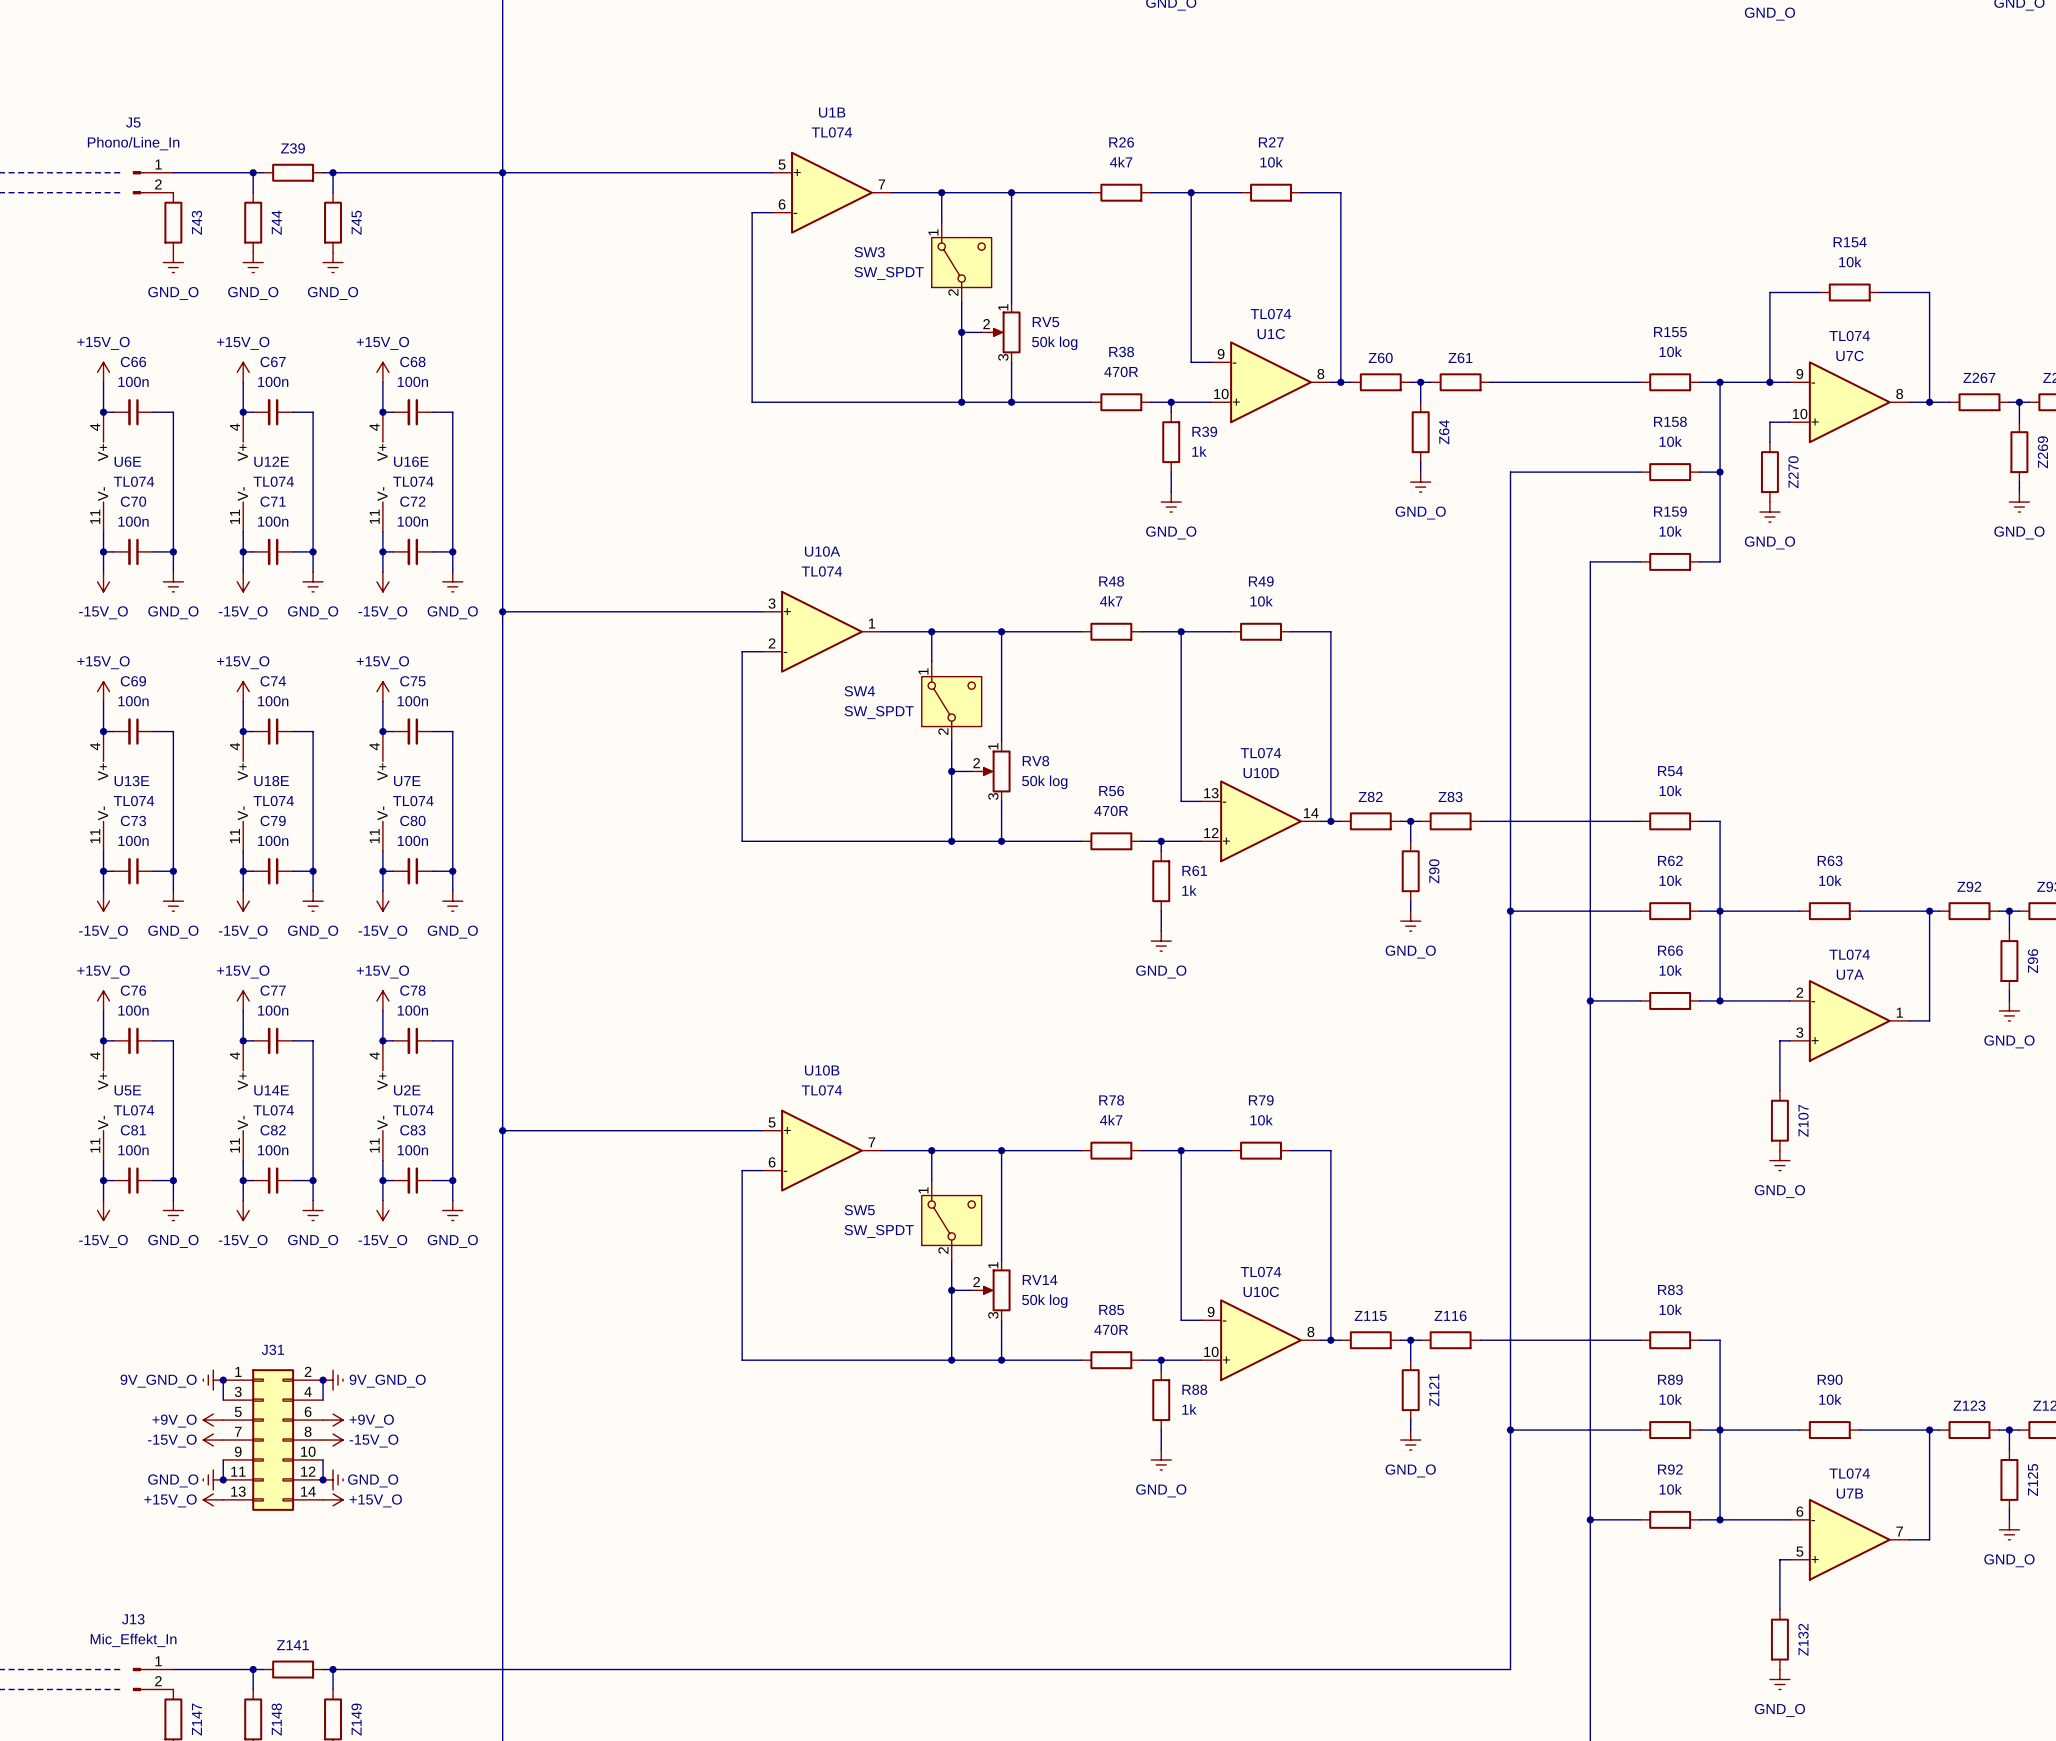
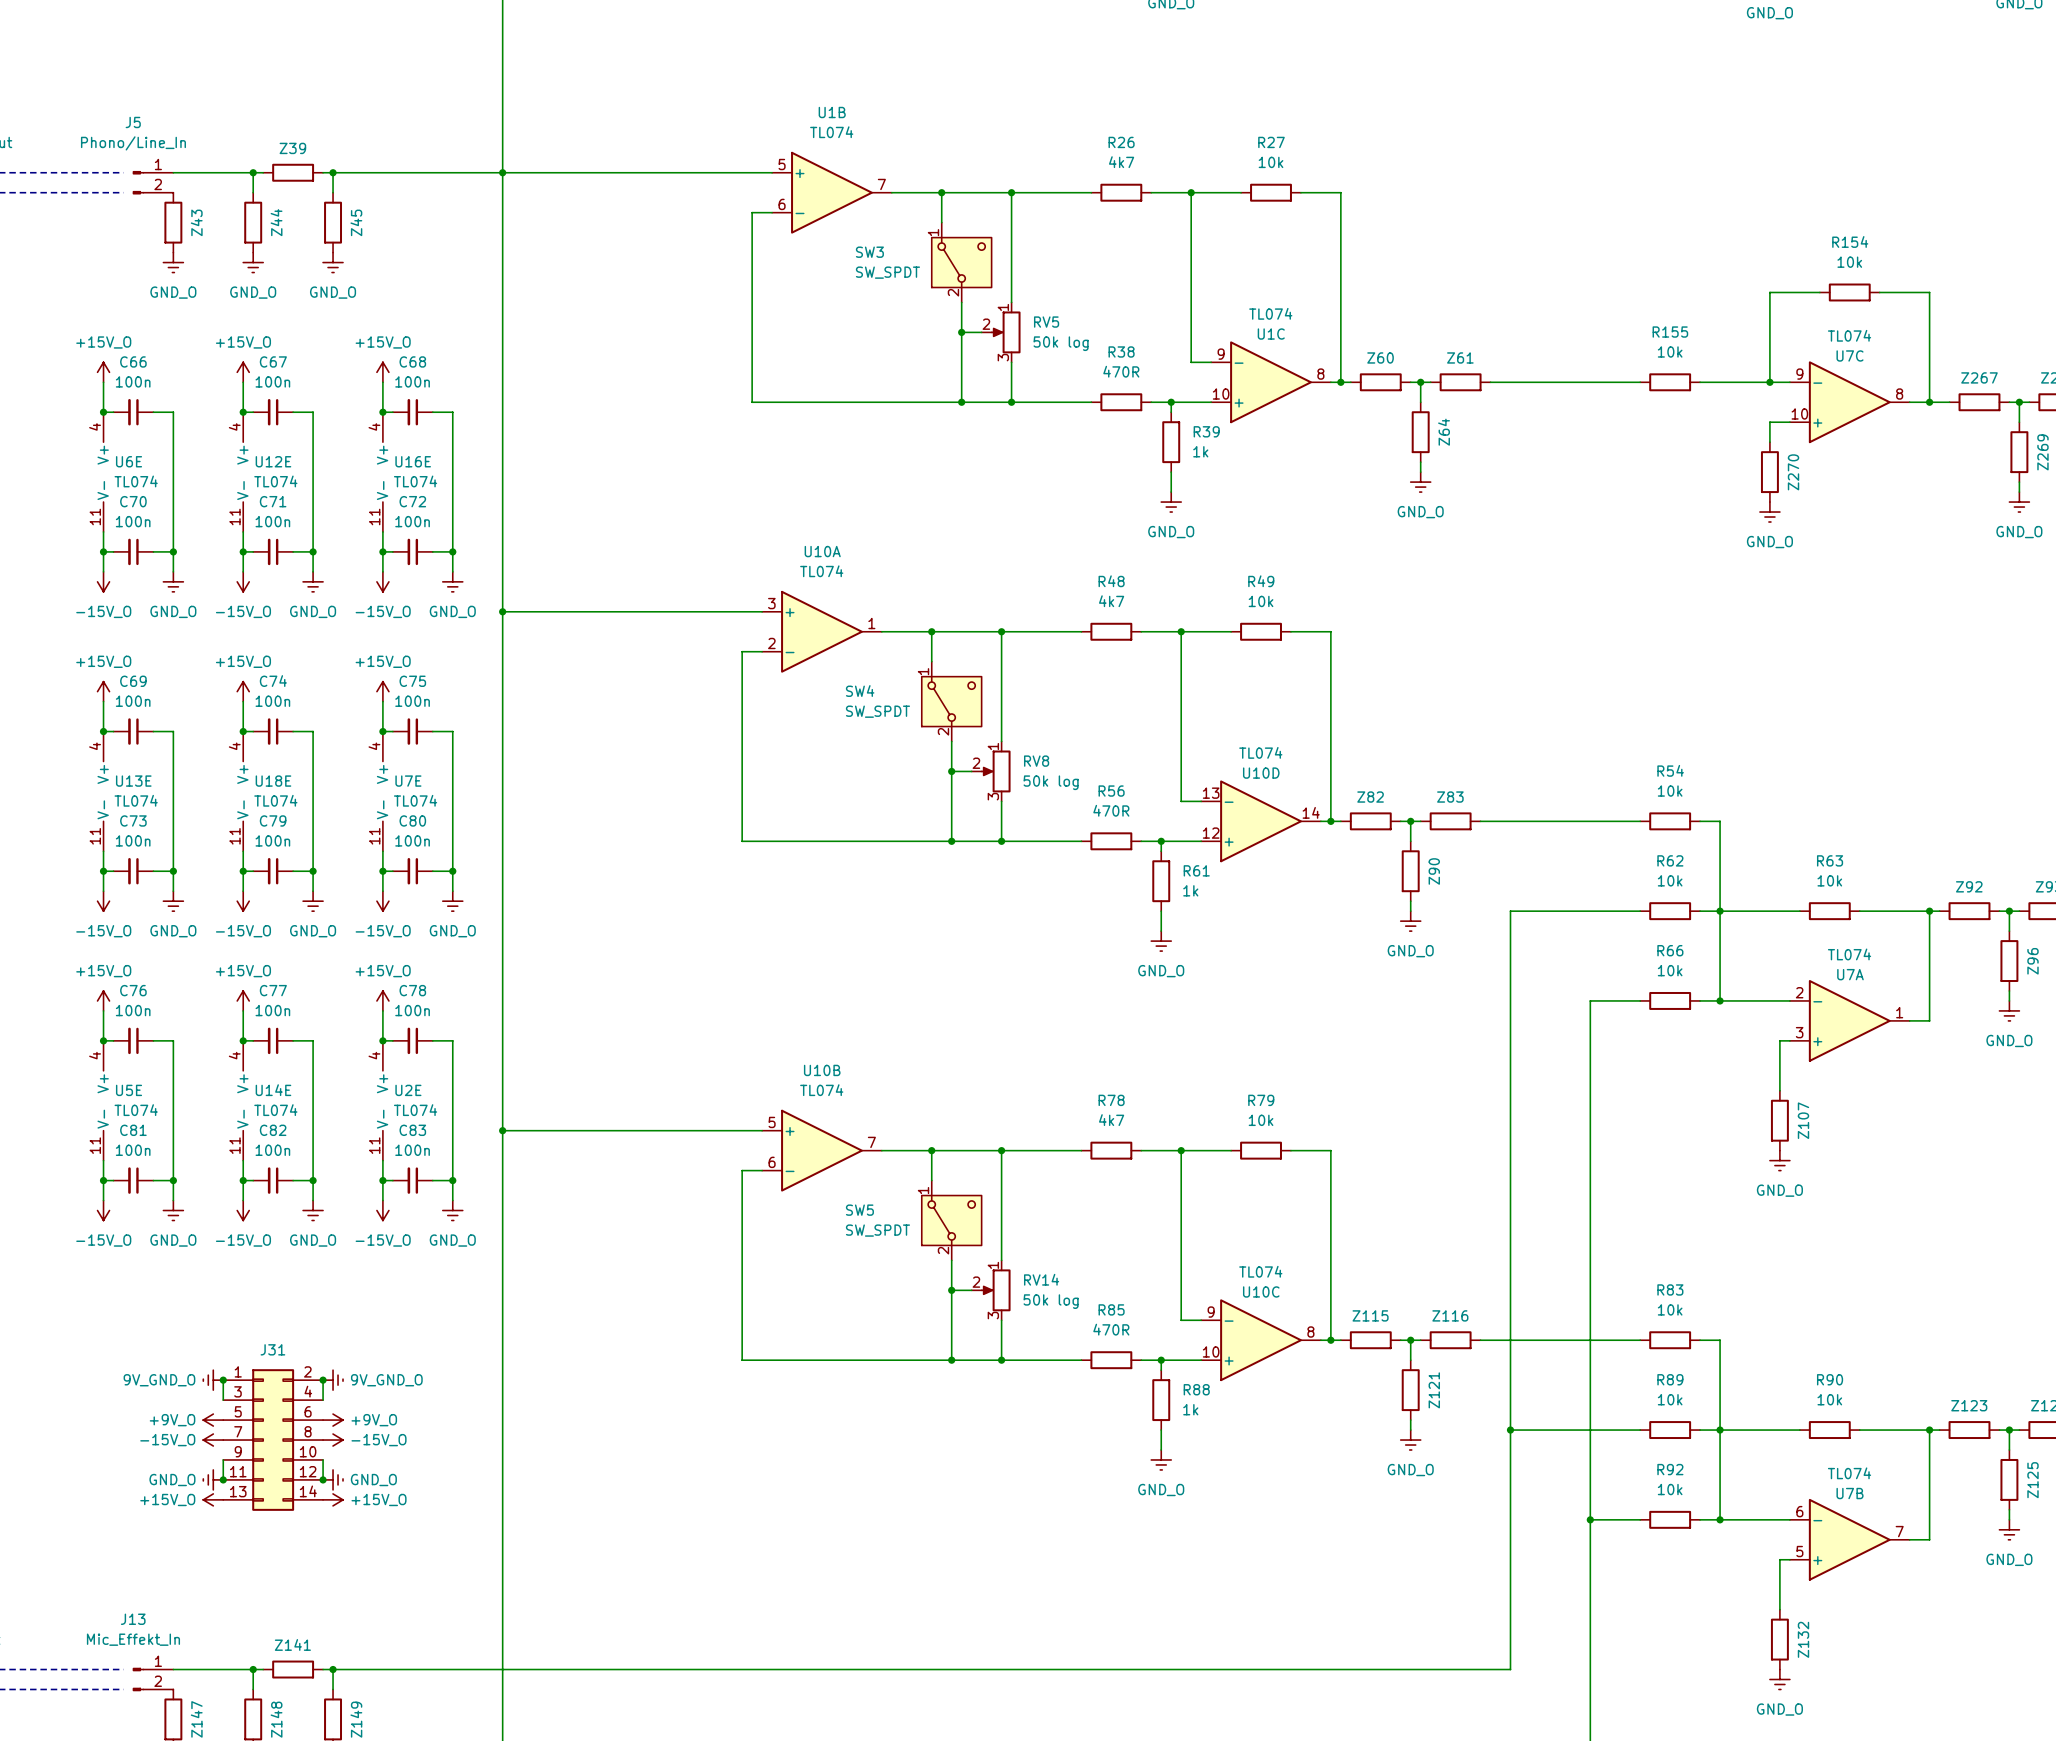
wire: (1720, 382) (1720, 561) (1700, 561) -> none
junction: (1720, 382) -> none
wire: (1640, 472) (1510, 472) (1510, 911) -> none
R158: 10k (1670, 472) -> none
wire: (1700, 472) (1720, 472) -> none
junction: (1720, 472) -> none
wire: (1640, 561) (1590, 561) (1590, 1000) -> none
R159: 10k (1670, 561) -> none
junction: (1510, 911) -> none
junction: (1590, 1000) -> none

